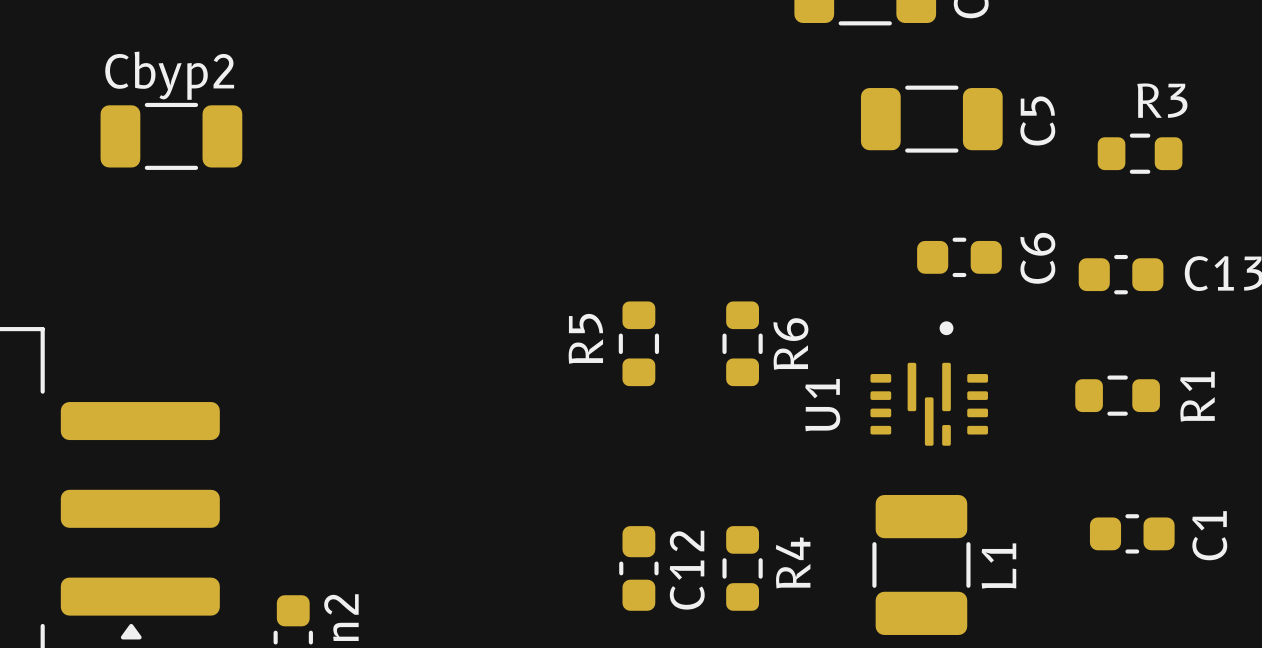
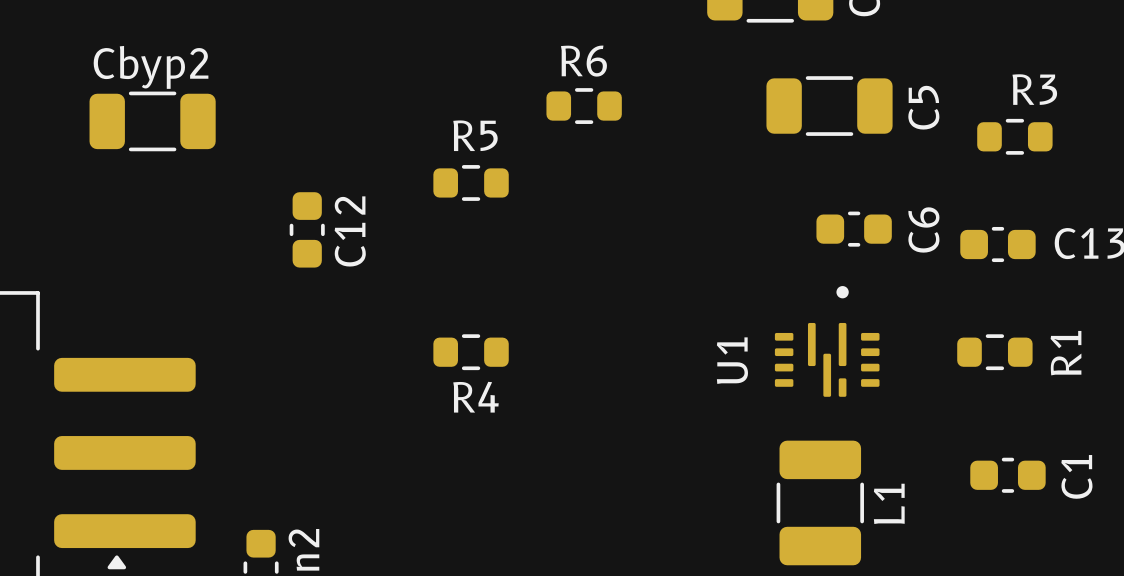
R5 rotation: 0° (638, 343) -> 90° clockwise (471, 182)
R5 position: (638, 343) -> (471, 182)
R6 rotation: 0° (742, 343) -> 90° clockwise (584, 106)
R6 position: (742, 343) -> (584, 106)
R6 name position: R6 (790, 343) -> R6 (583, 61)
C12 position: (638, 568) -> (307, 229)
R4 rotation: 0° (742, 568) -> 90° clockwise (471, 352)
R4 position: (742, 568) -> (471, 352)

